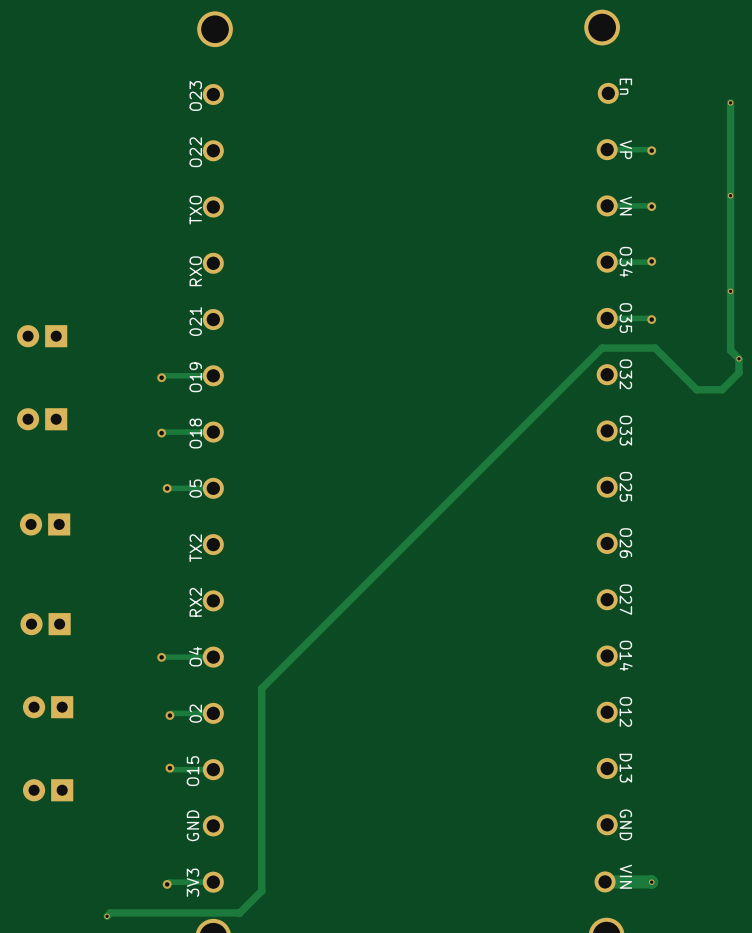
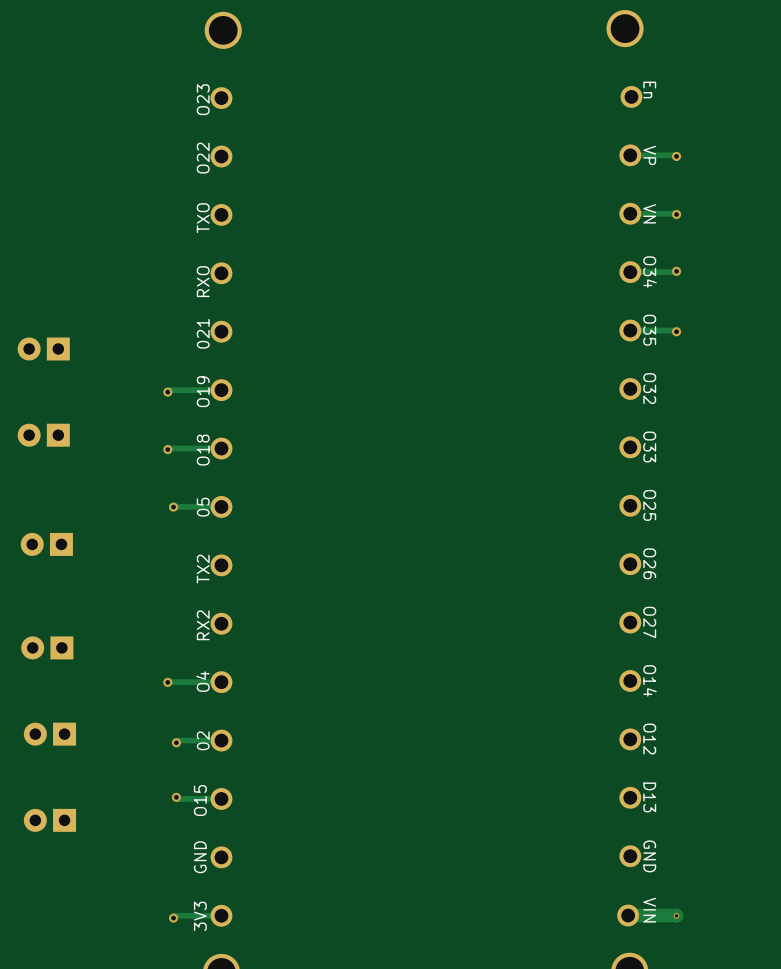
track: (730, 102) (730, 350) (738, 358) (738, 372) (722, 389) (696, 389) (655, 348) (602, 348) (261, 688) (261, 891) (239, 913) (110, 912) (107, 916) -> none
via: (730, 102) -> none
via: (730, 195) -> none
via: (730, 291) -> none
via: (738, 358) -> none
via: (107, 916) -> none

